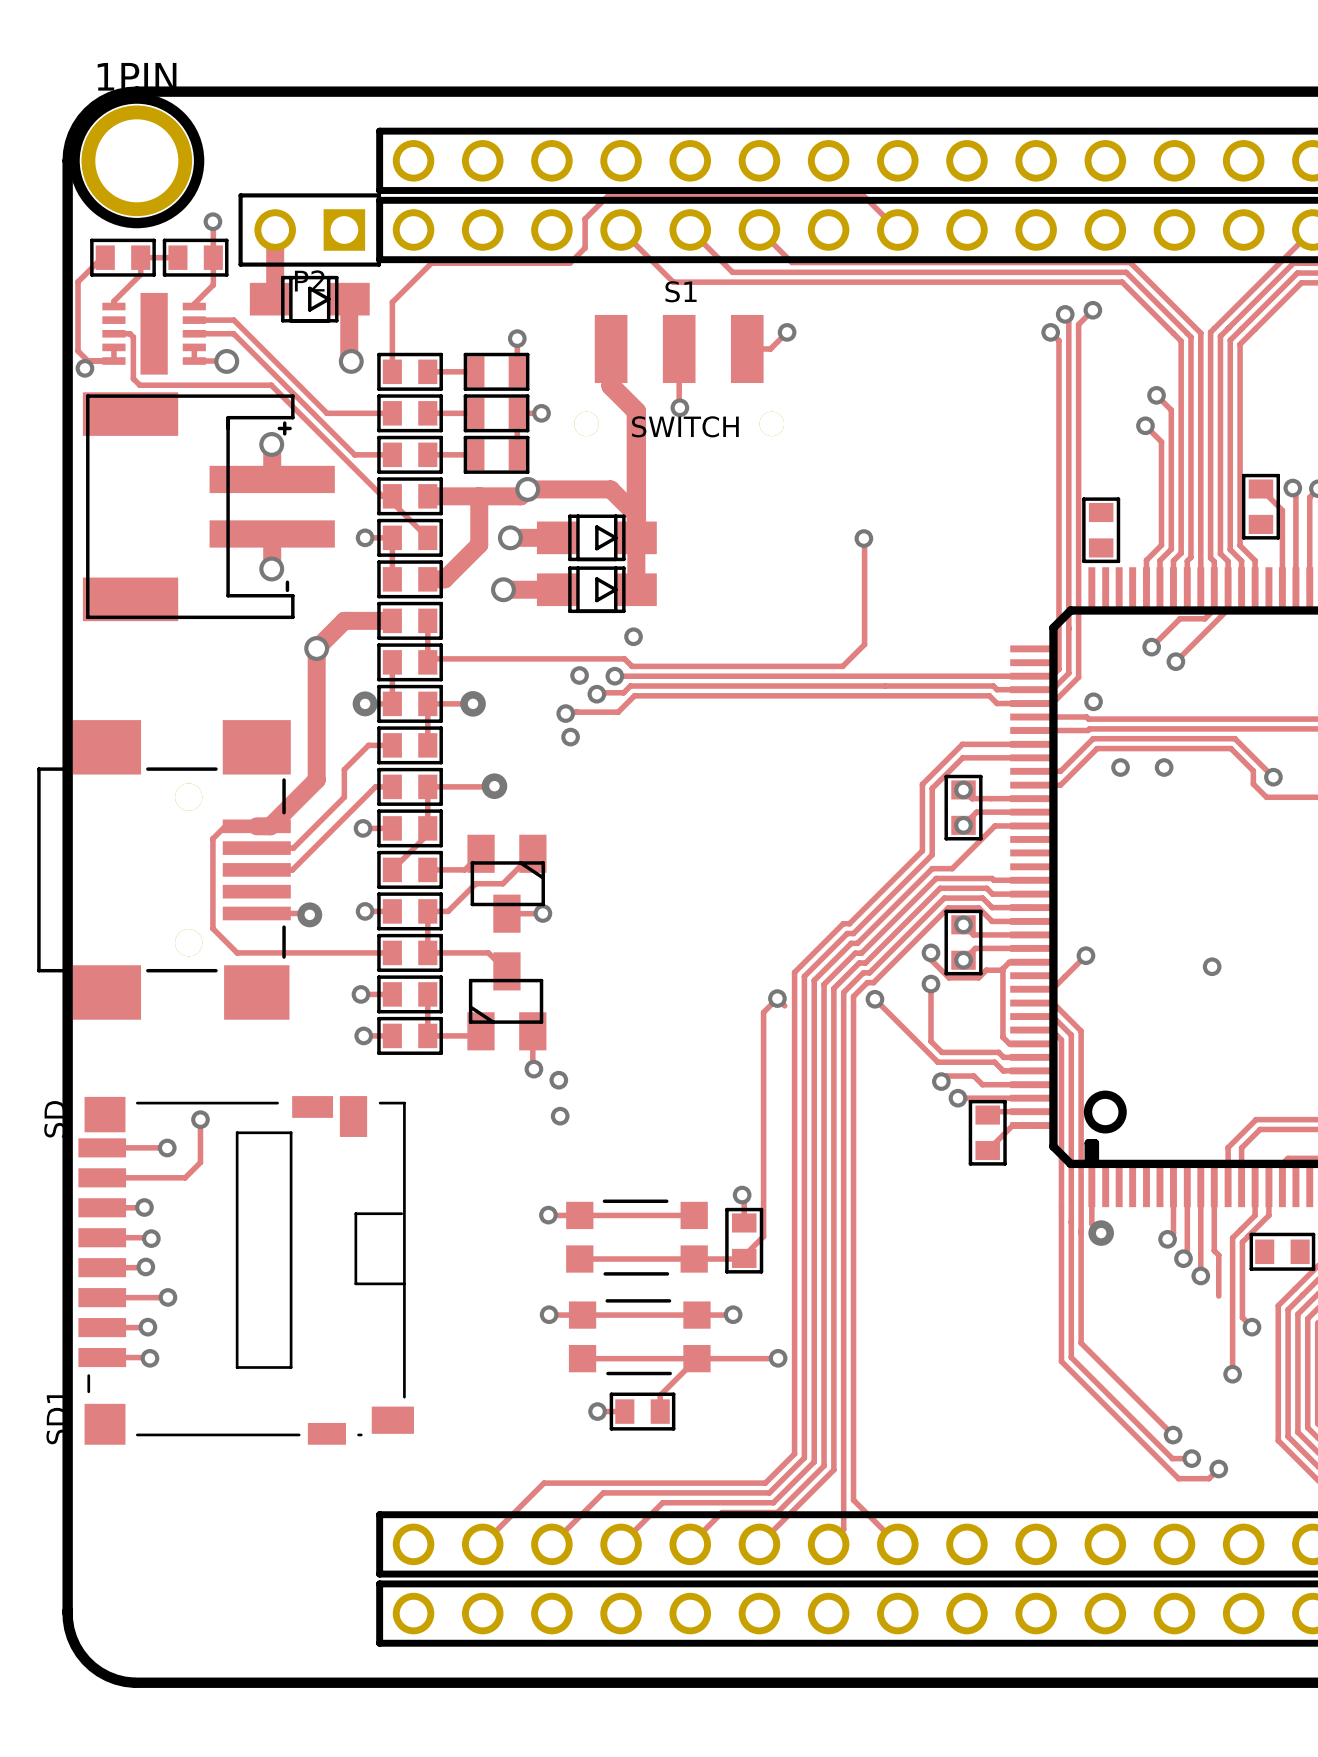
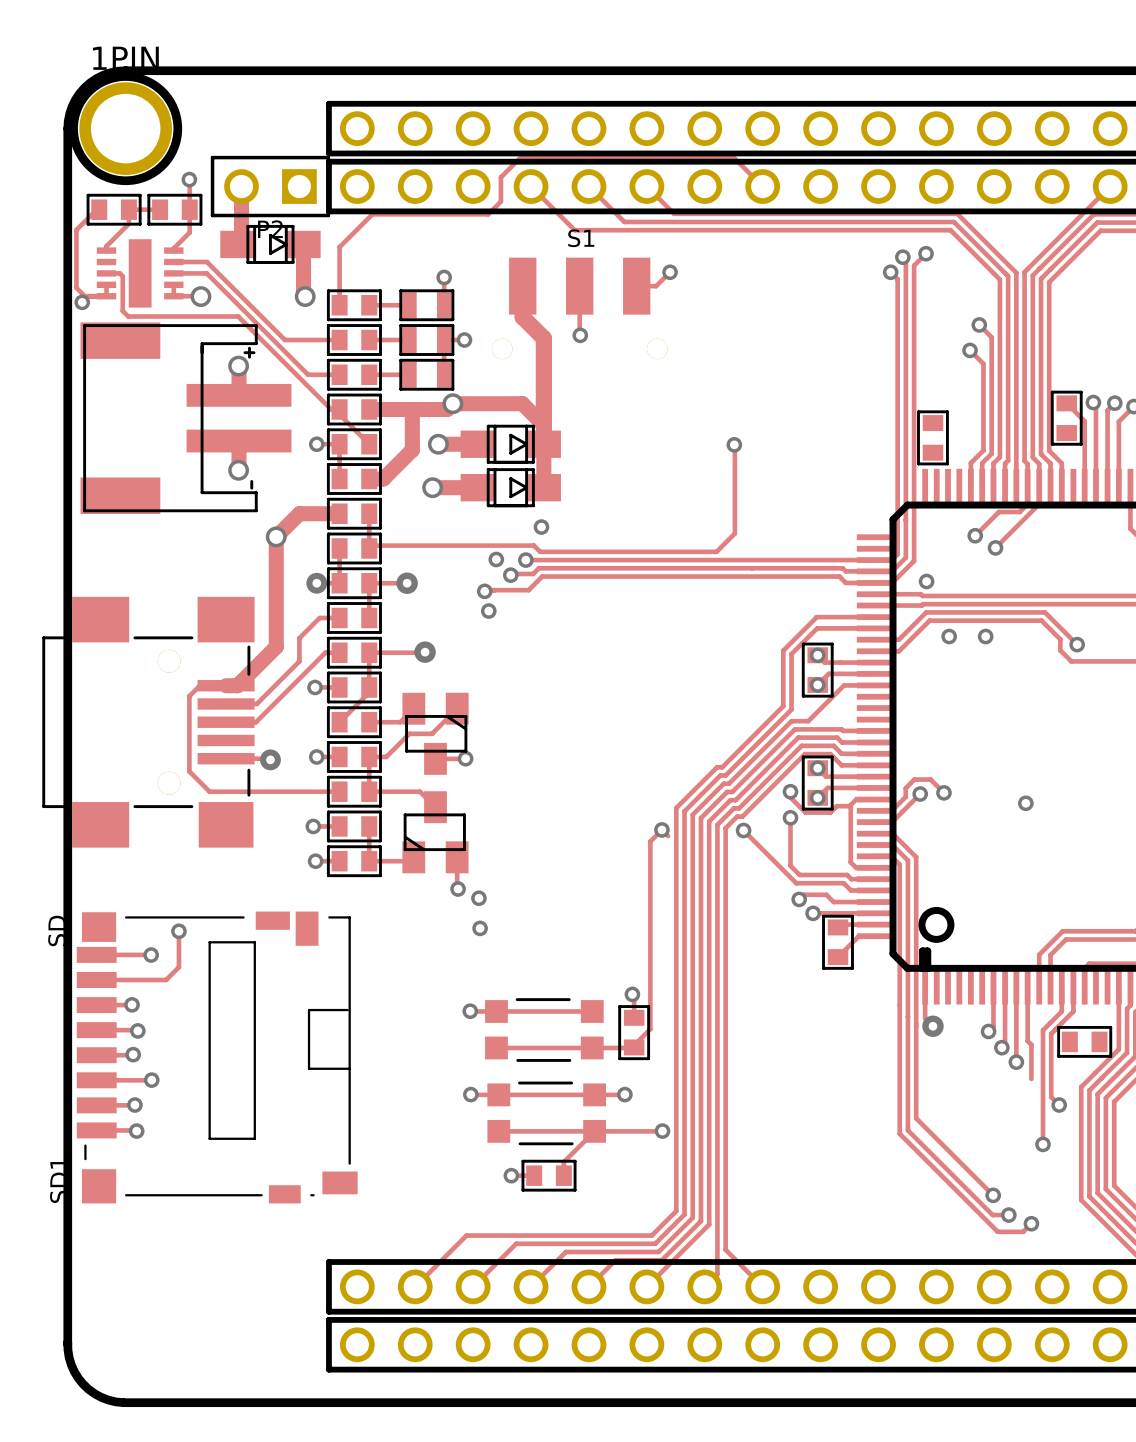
S1 value: SWITCH (685, 426) -> none
track: none -> (943, 792) (930, 779) (914, 779) (905, 788) (905, 796) (891, 810) (874, 810)
via: none -> (943, 792)

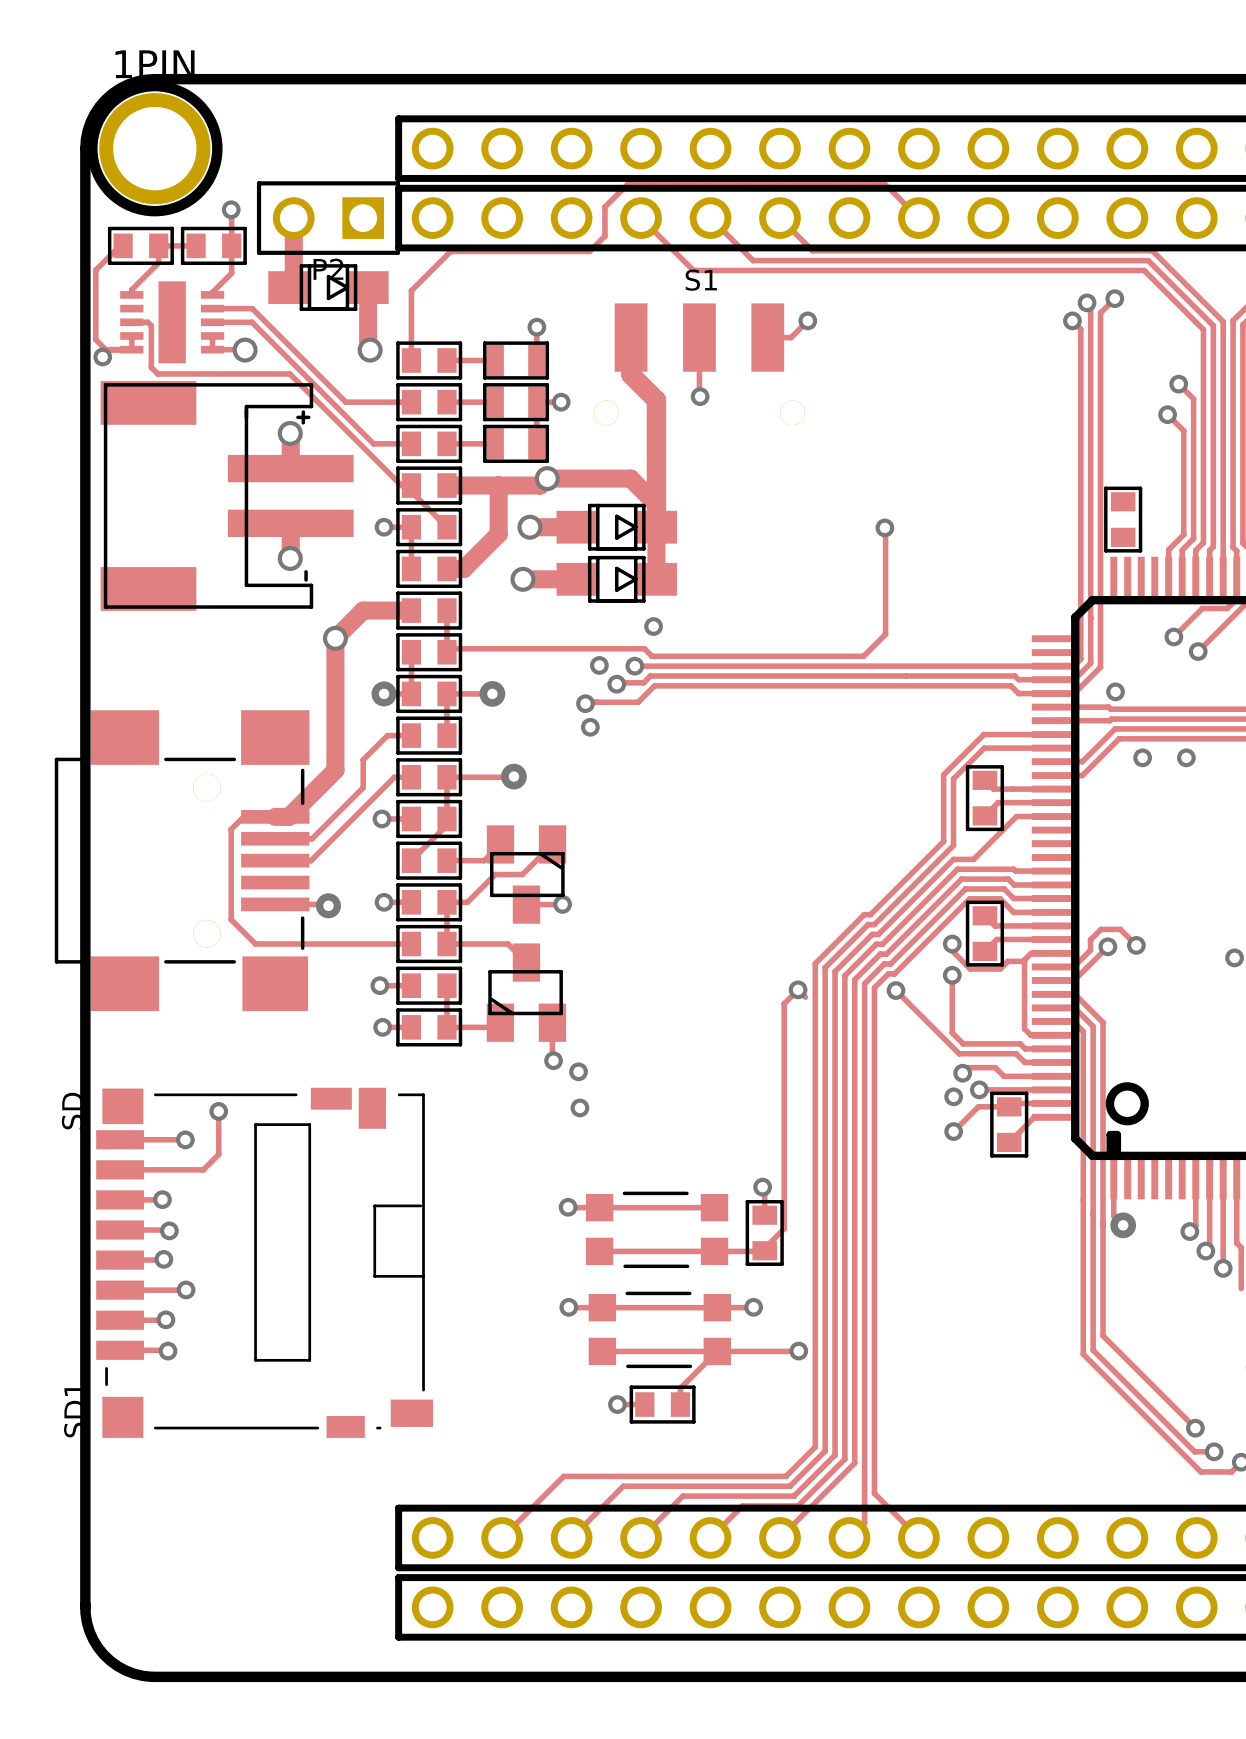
via: (817, 655) -> none
via: (817, 684) -> none
via: (817, 768) -> none
via: (817, 797) -> none
via: none -> (953, 1096)
track: none -> (1009, 1106) (978, 1106) (953, 1131)
via: none -> (953, 1131)

